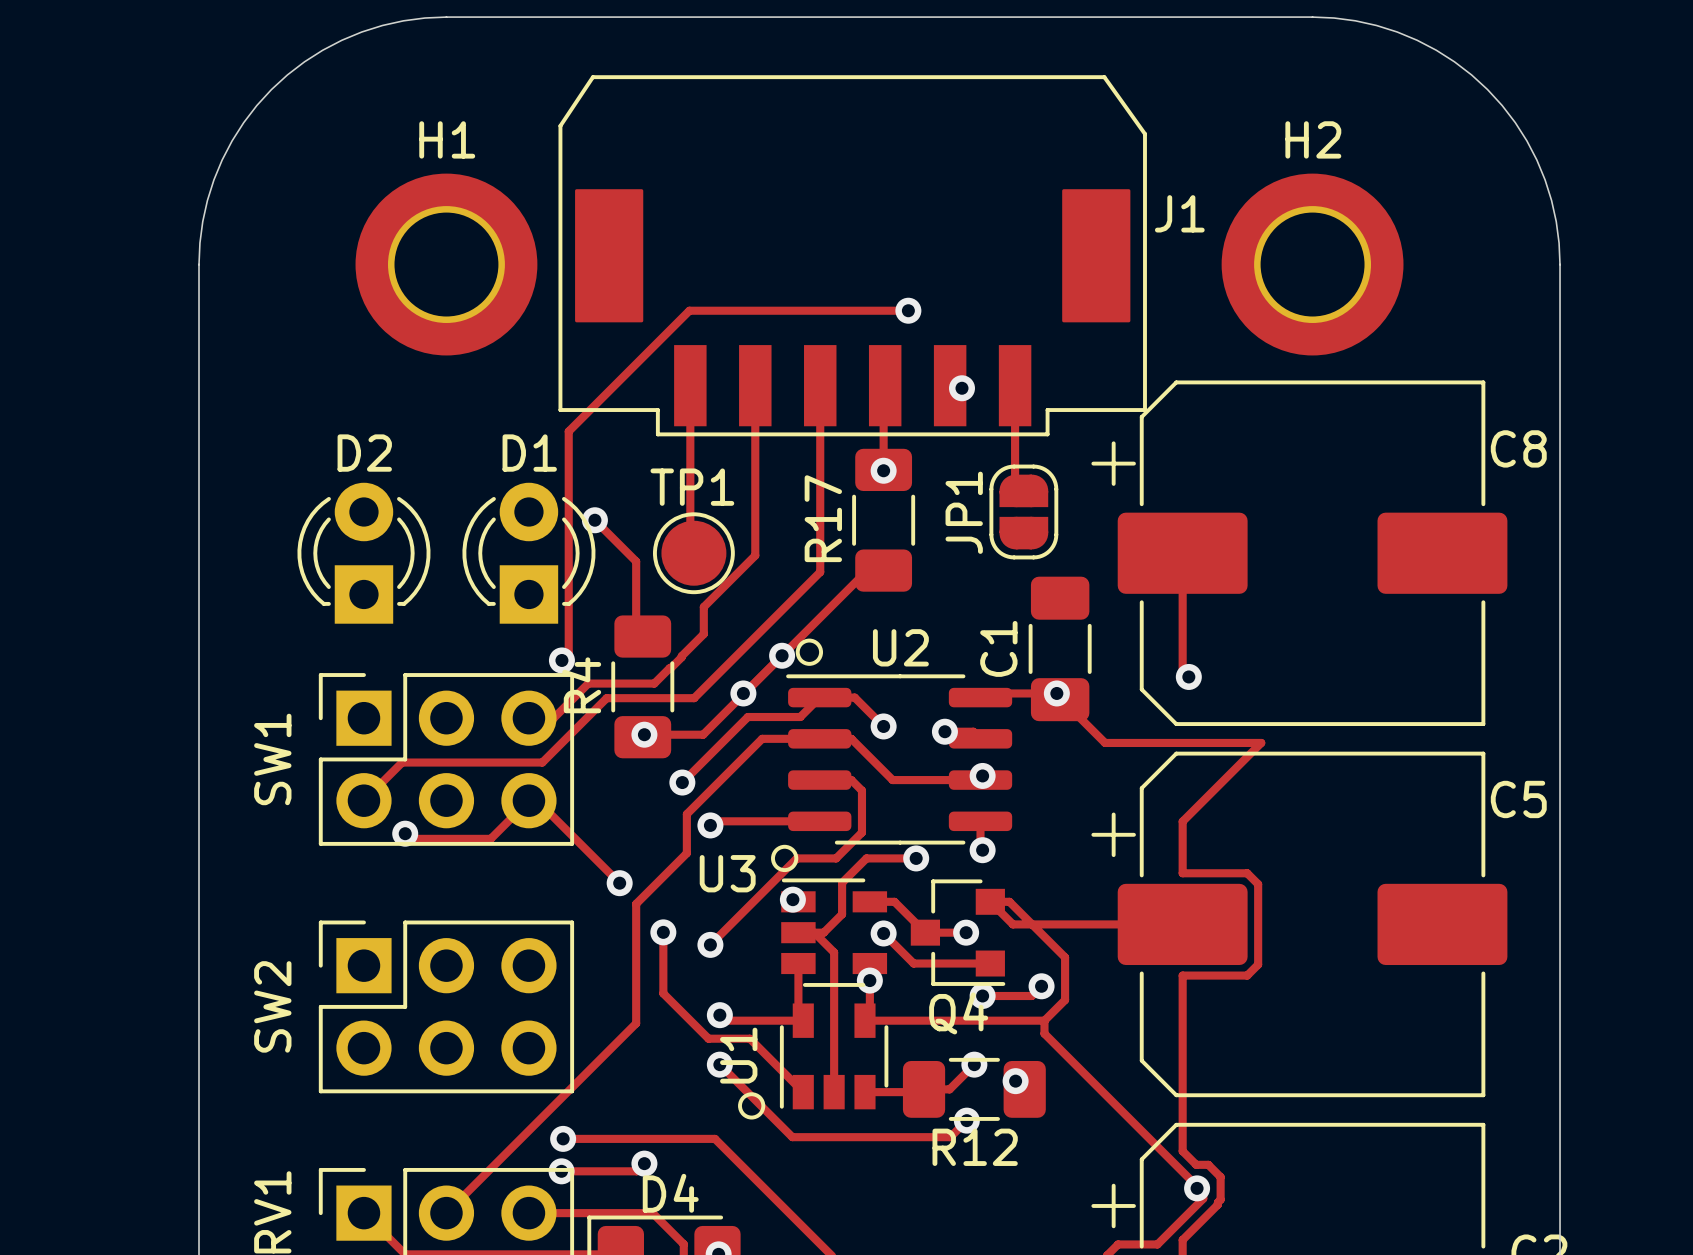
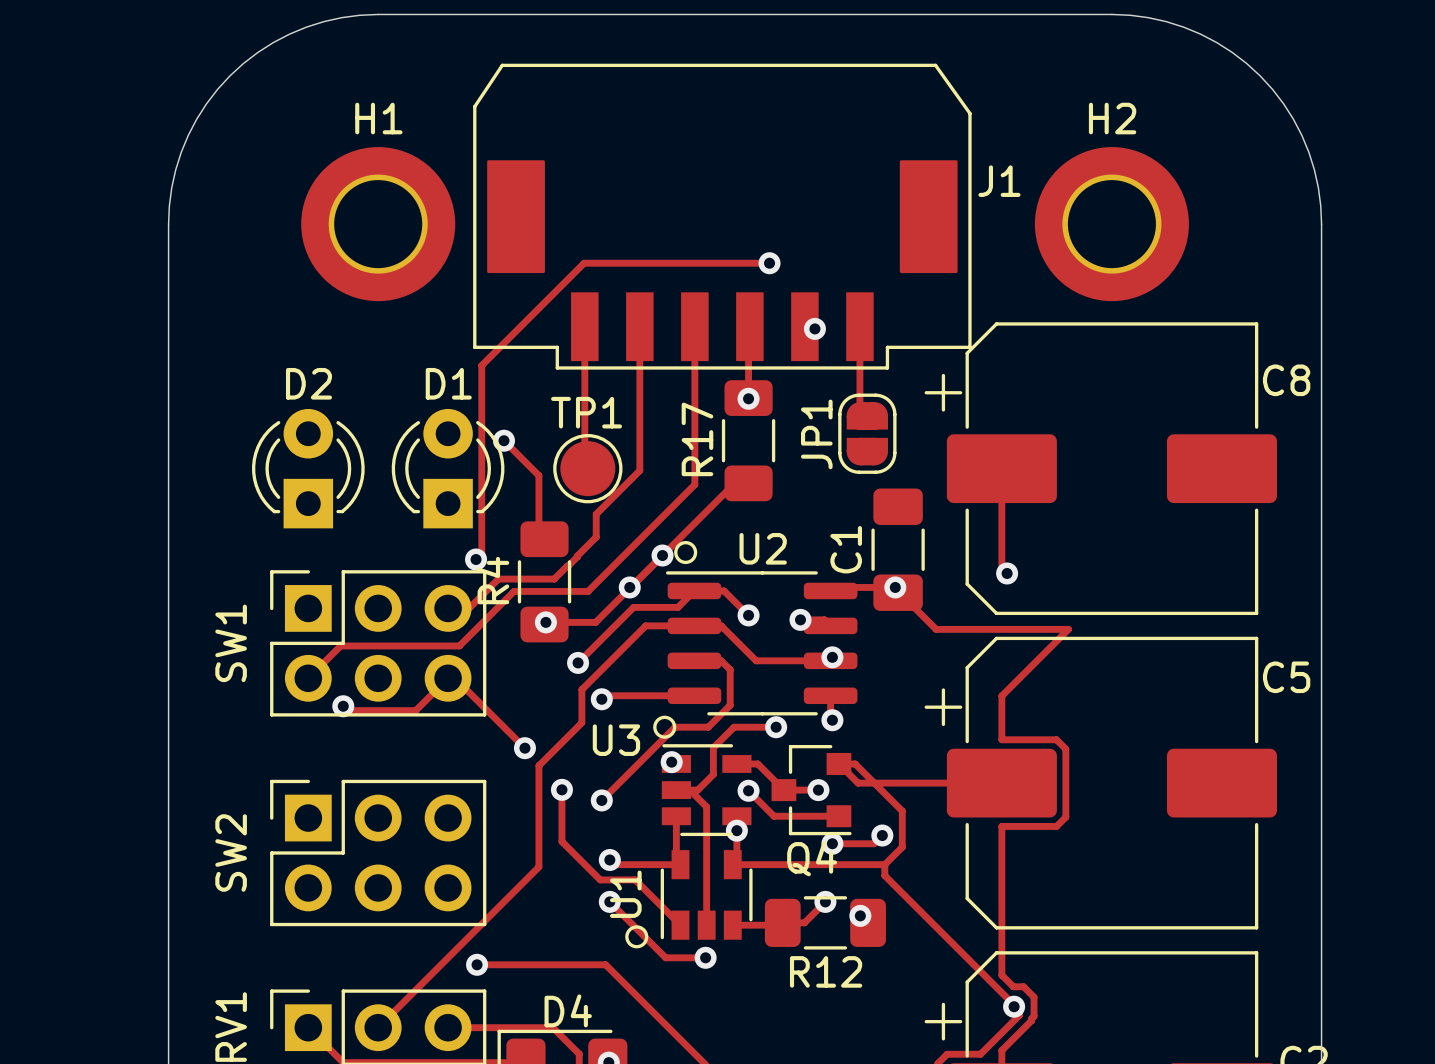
track: (966, 1120) (950, 1137) (792, 1137) (785, 1130) -> (705, 957) (665, 957)
via: (966, 1120) -> none
via: none -> (705, 957)
track: (644, 1163) (636, 1171) (561, 1171) -> none
via: (644, 1163) -> none
via: (561, 1171) -> none

